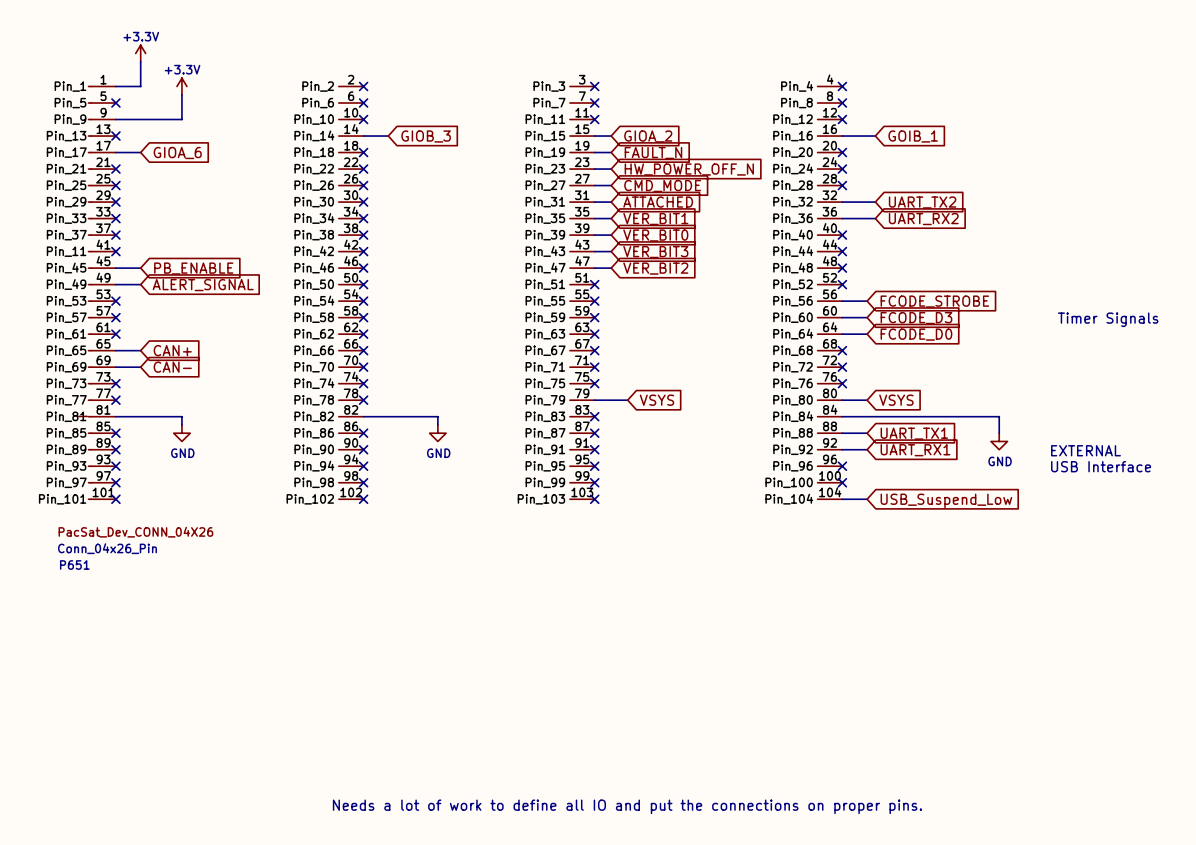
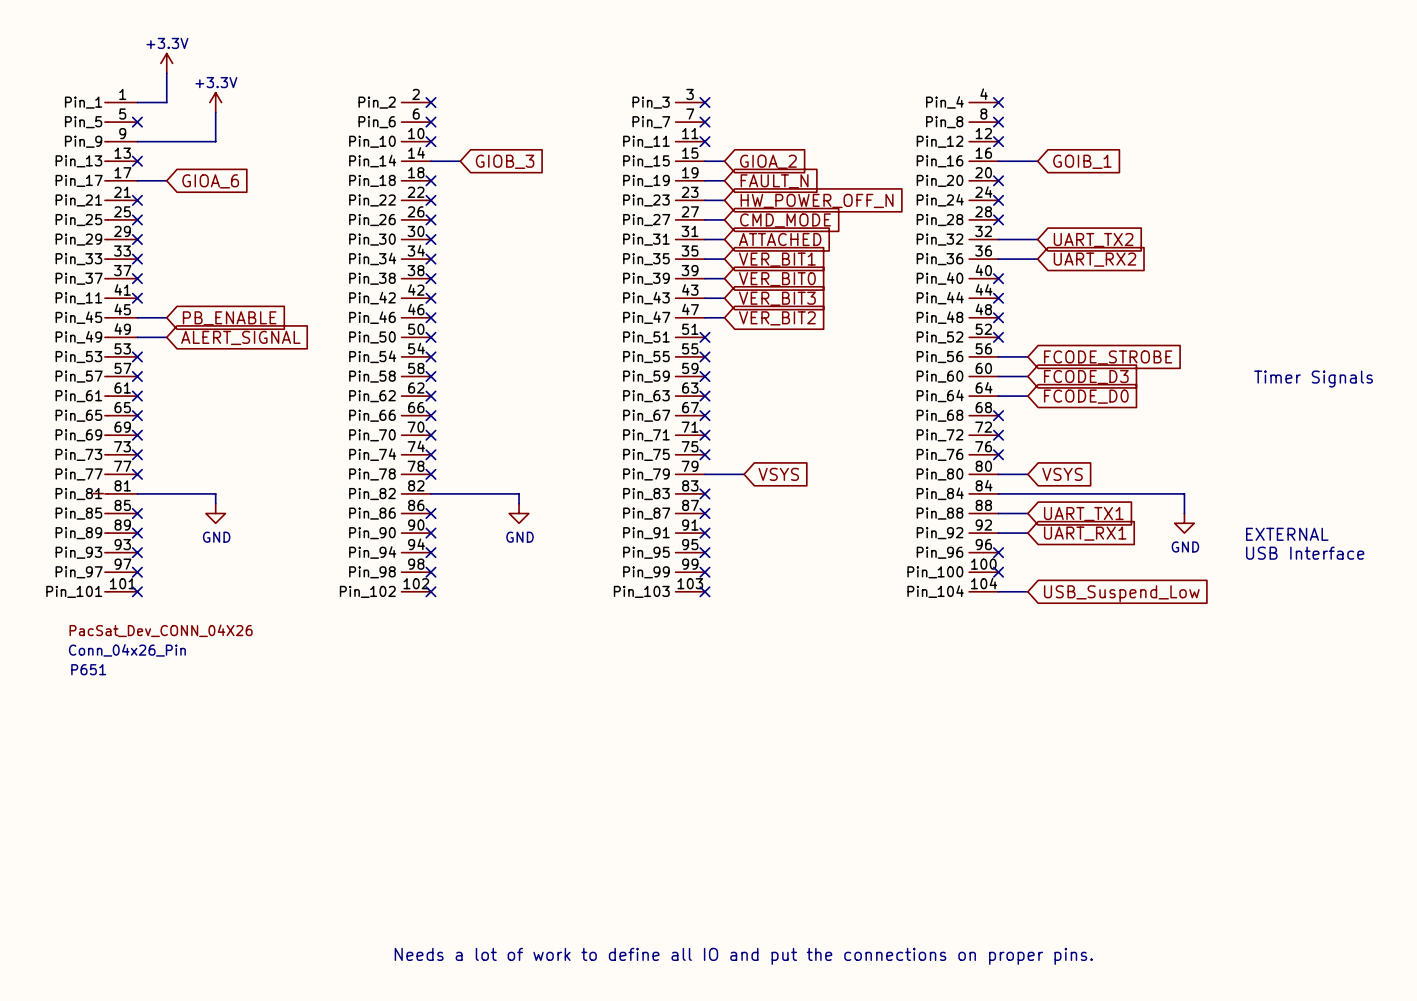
wire: (115, 350) (140, 350) -> none
no-connect mark: none -> (137, 415)
global label: CAN+ (172, 350) -> none
wire: (115, 367) (140, 367) -> none
no-connect mark: none -> (137, 435)
global label: CAN- (172, 367) -> none

